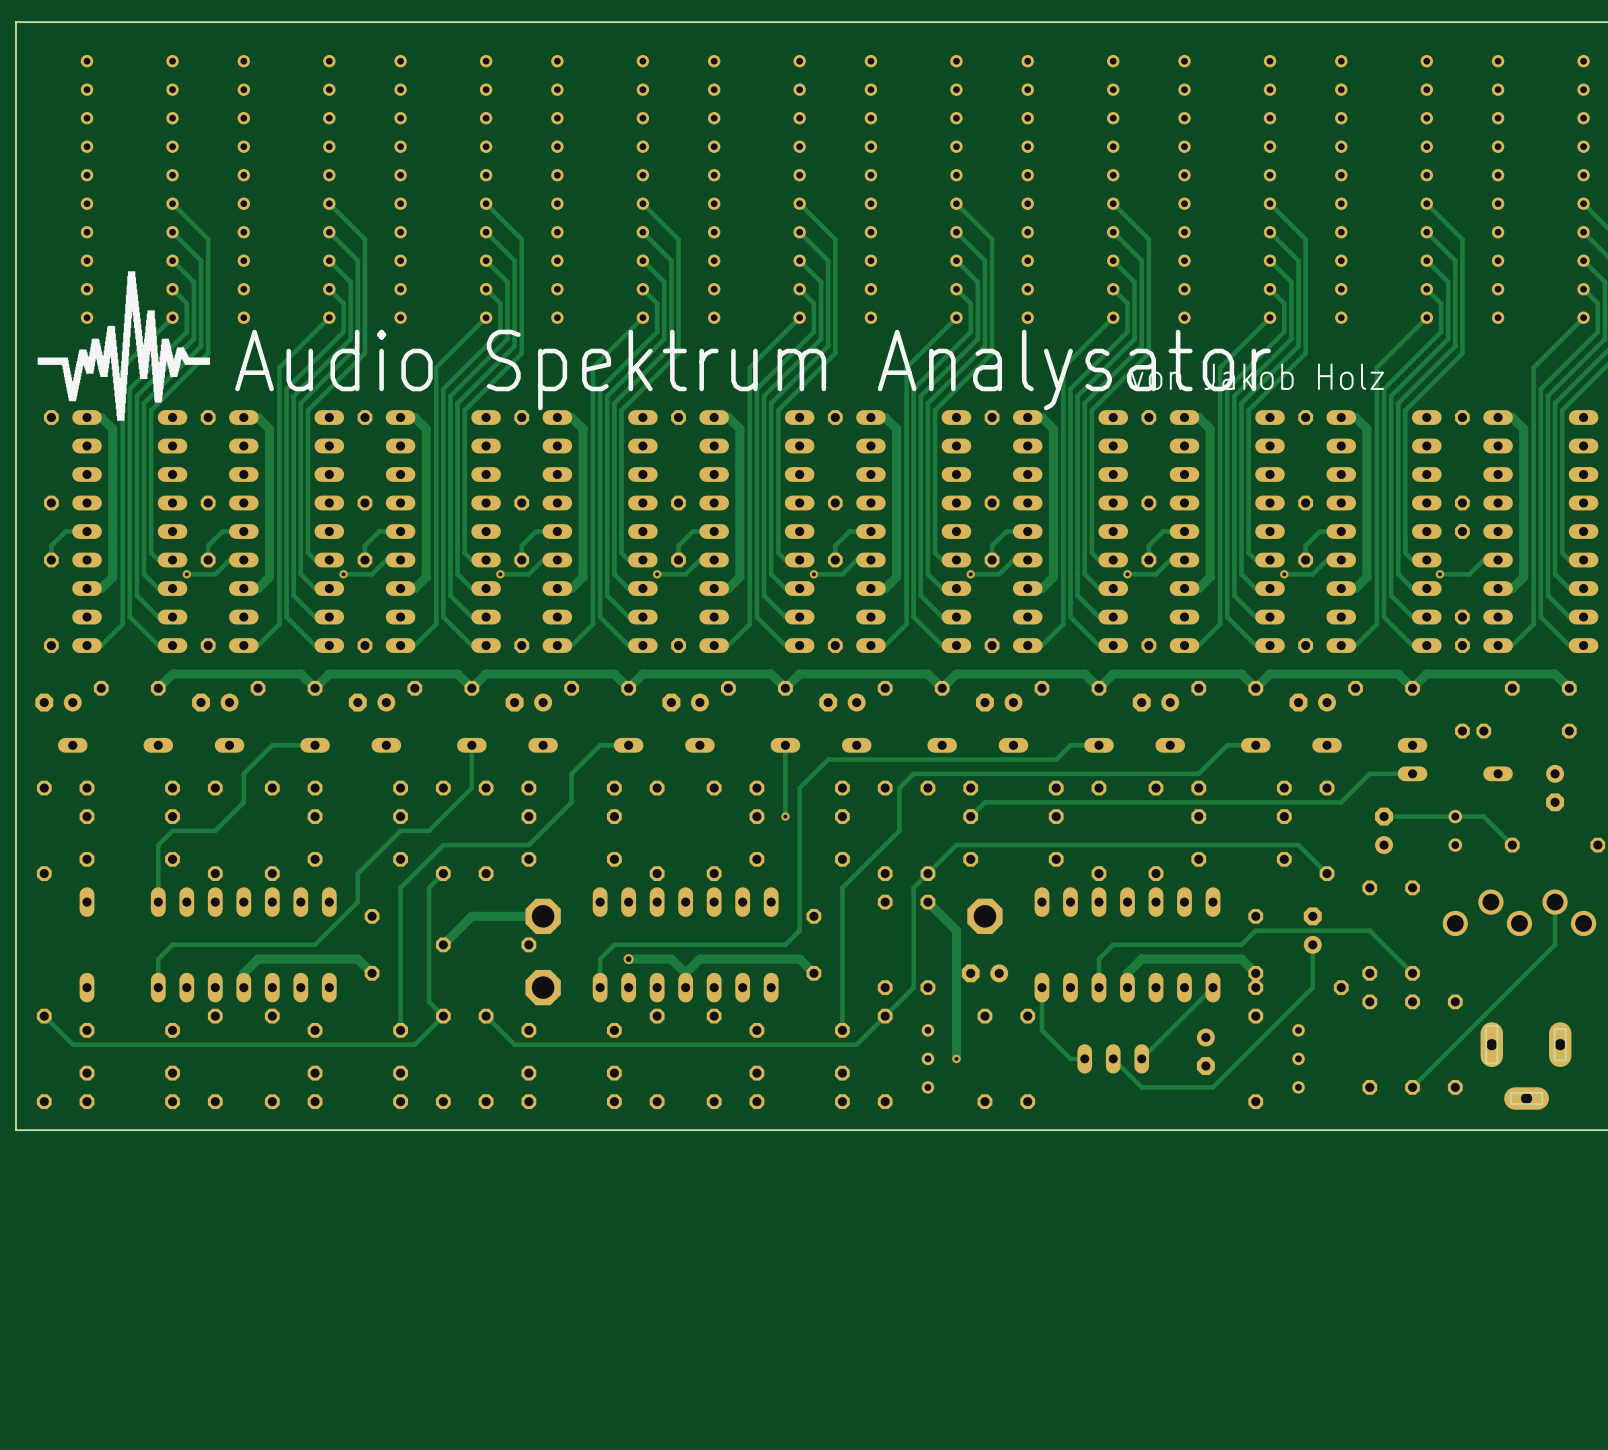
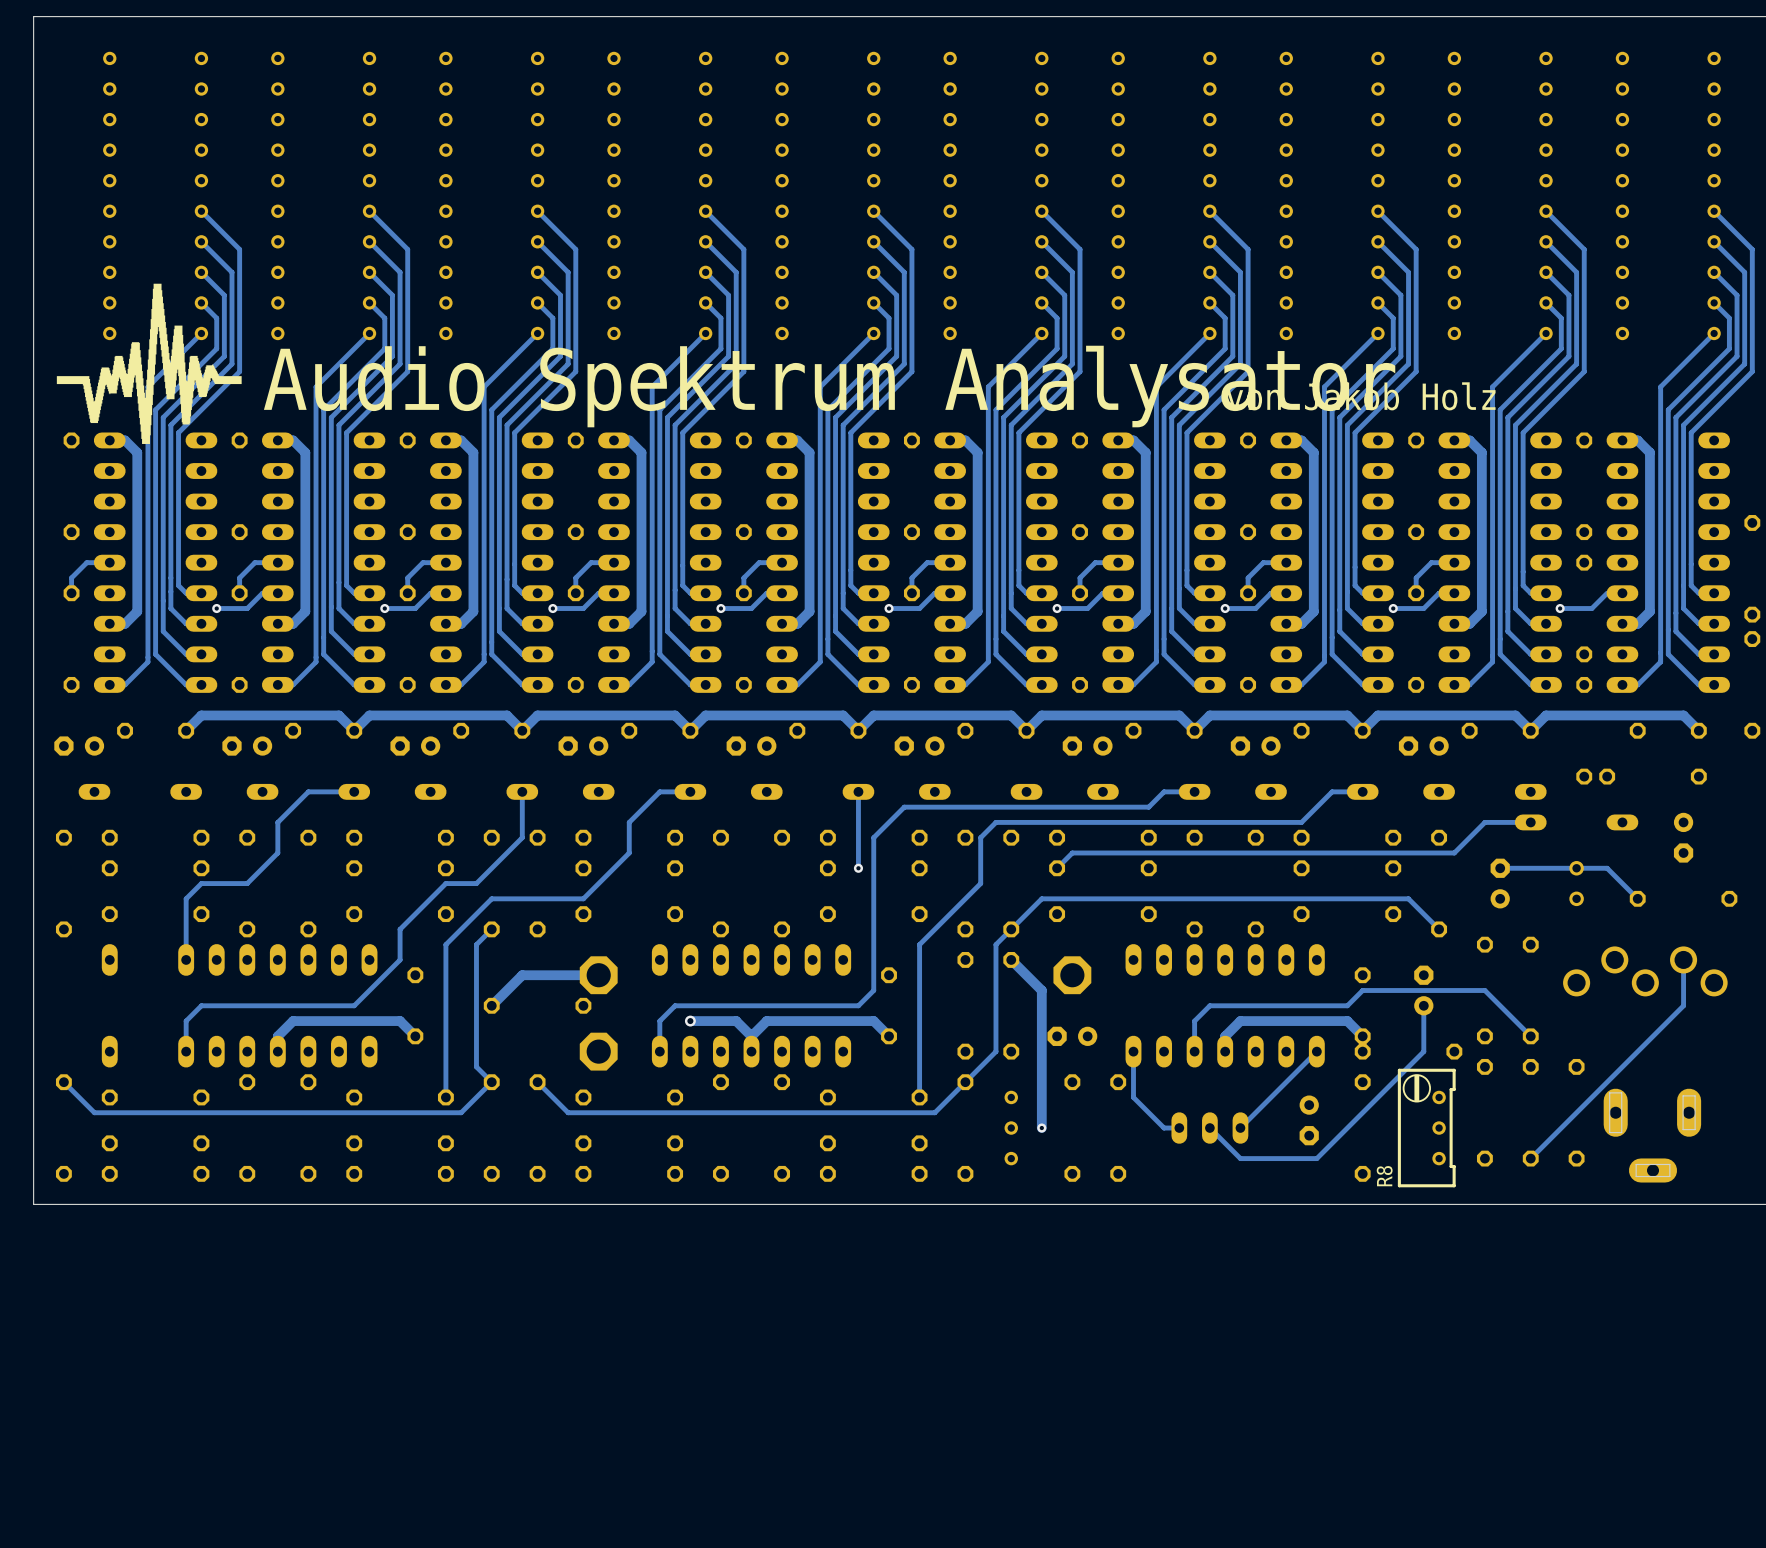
R8 side: top (1298, 1058) -> bottom (1426, 1128)

